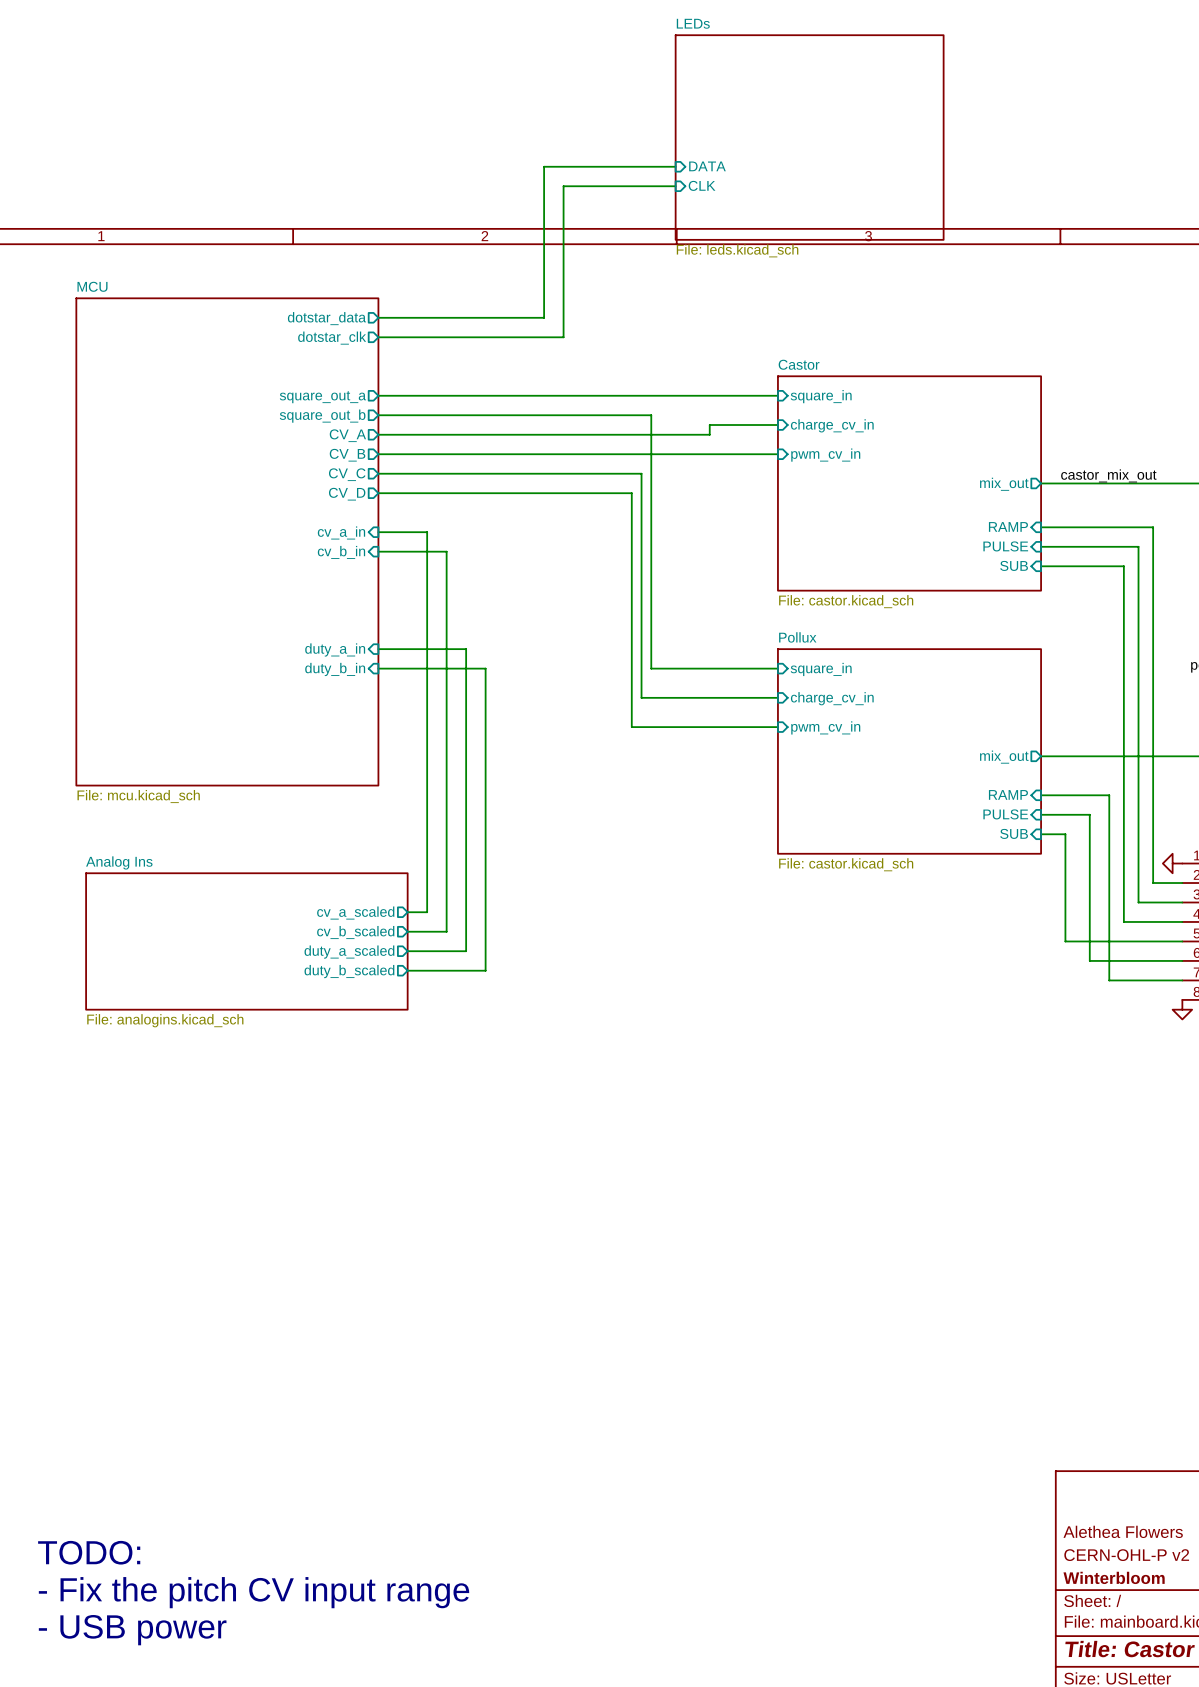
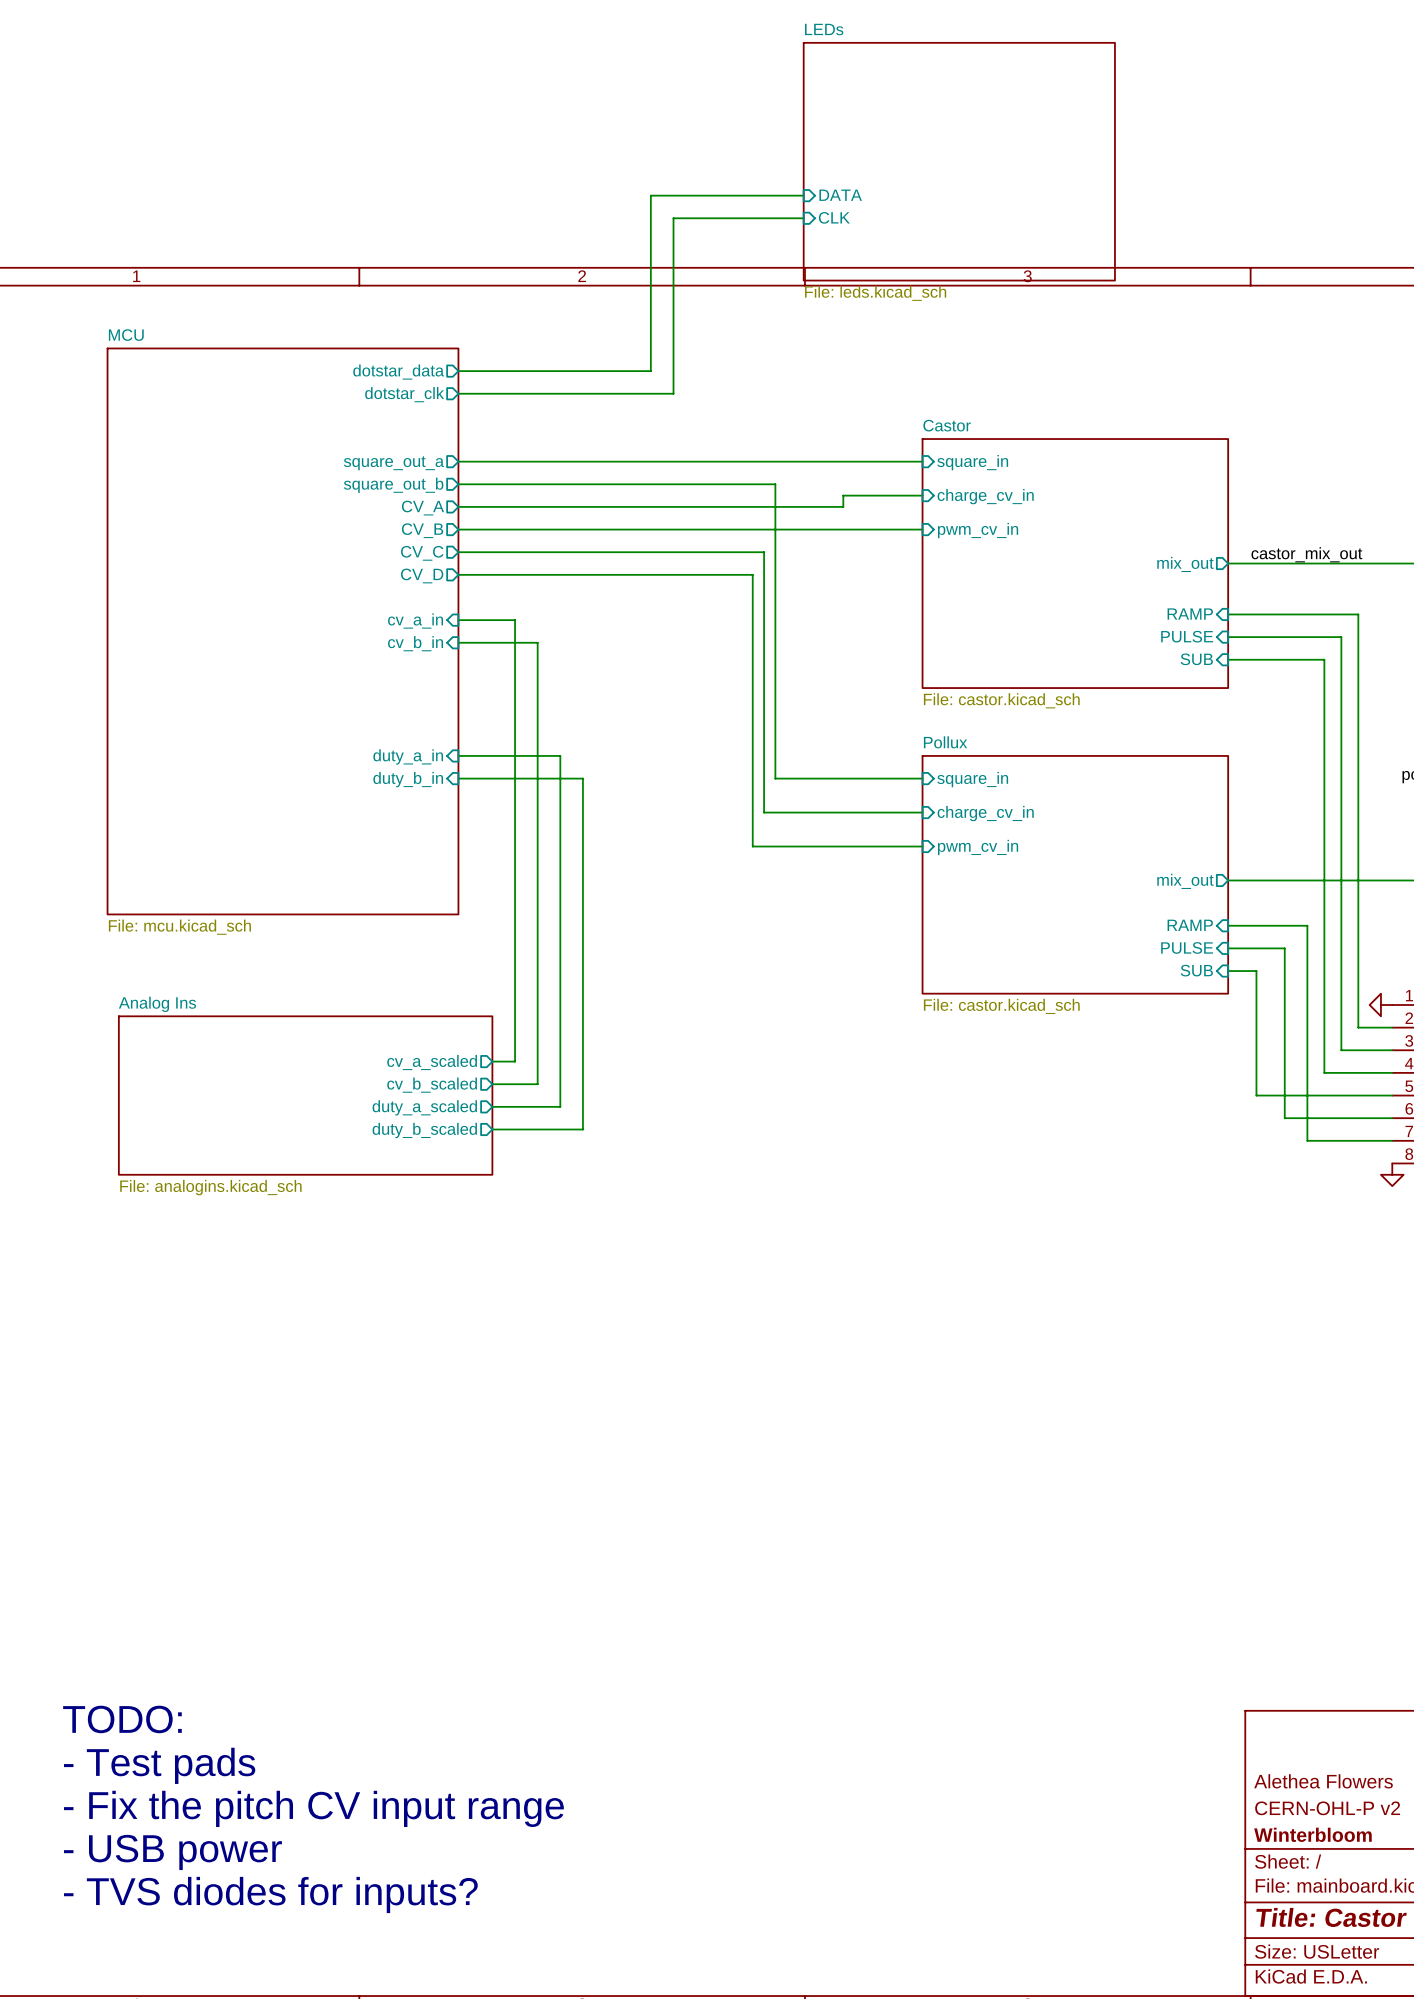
text: none -> TODO: (122, 1719)
text: none -> - Test pads (159, 1765)
text: TODO: (89, 1552) -> - Fix the pitch CV input range (313, 1808)
text: - Fix the pitch CV input range (254, 1592) -> - USB power (172, 1852)
text: - USB power (132, 1630) -> - TVS diodes for inputs? (270, 1894)

